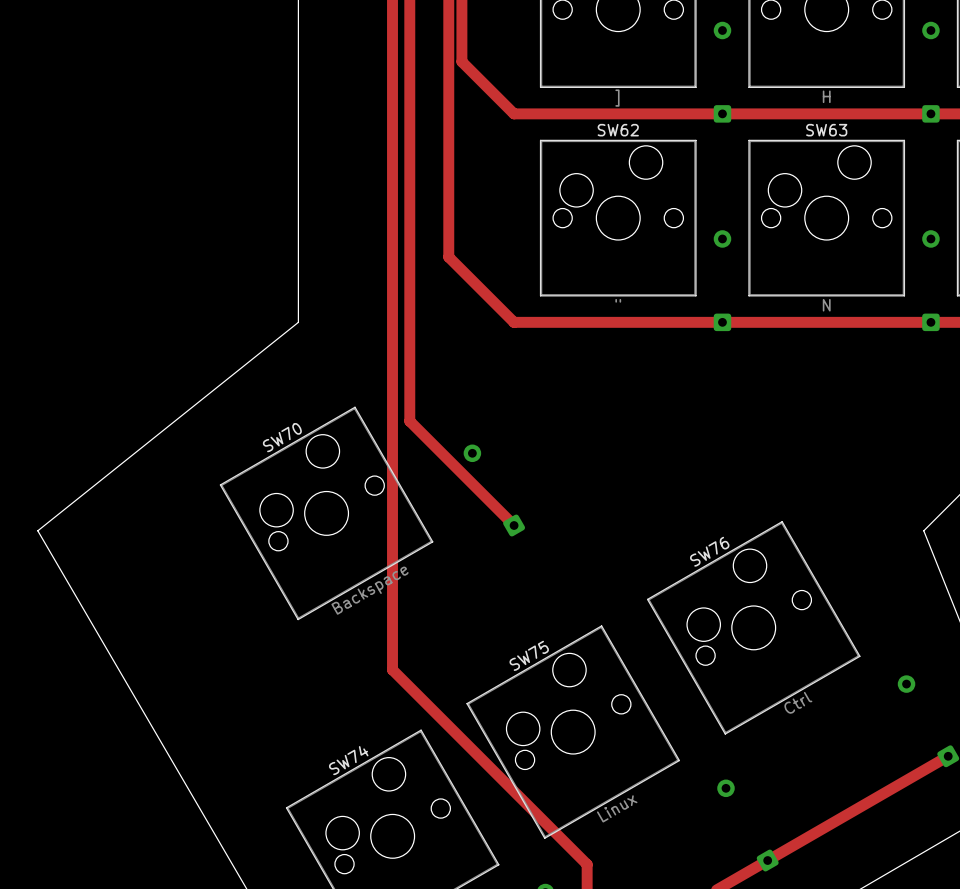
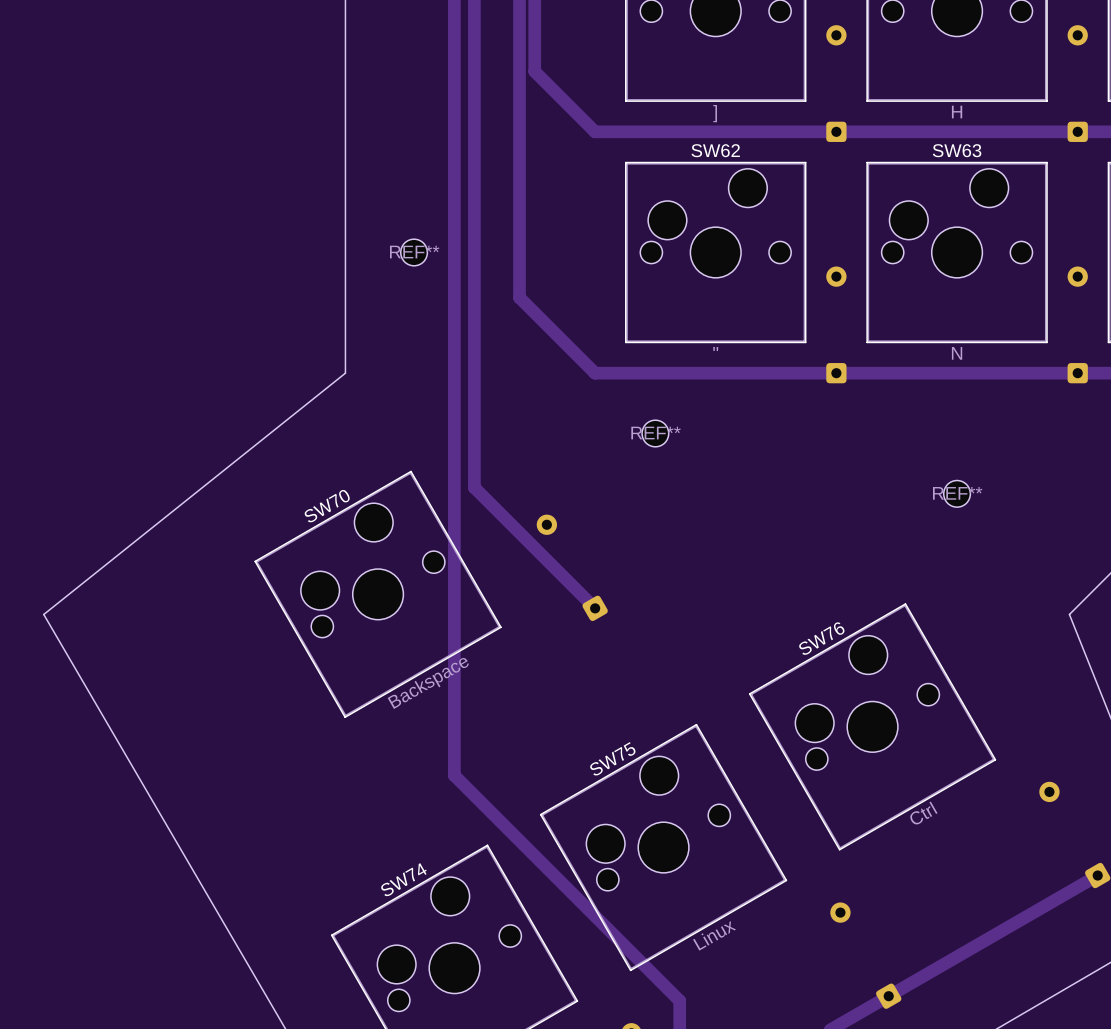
REF**: none -> (414, 252)
REF**: none -> (655, 433)
REF**: none -> (957, 493)

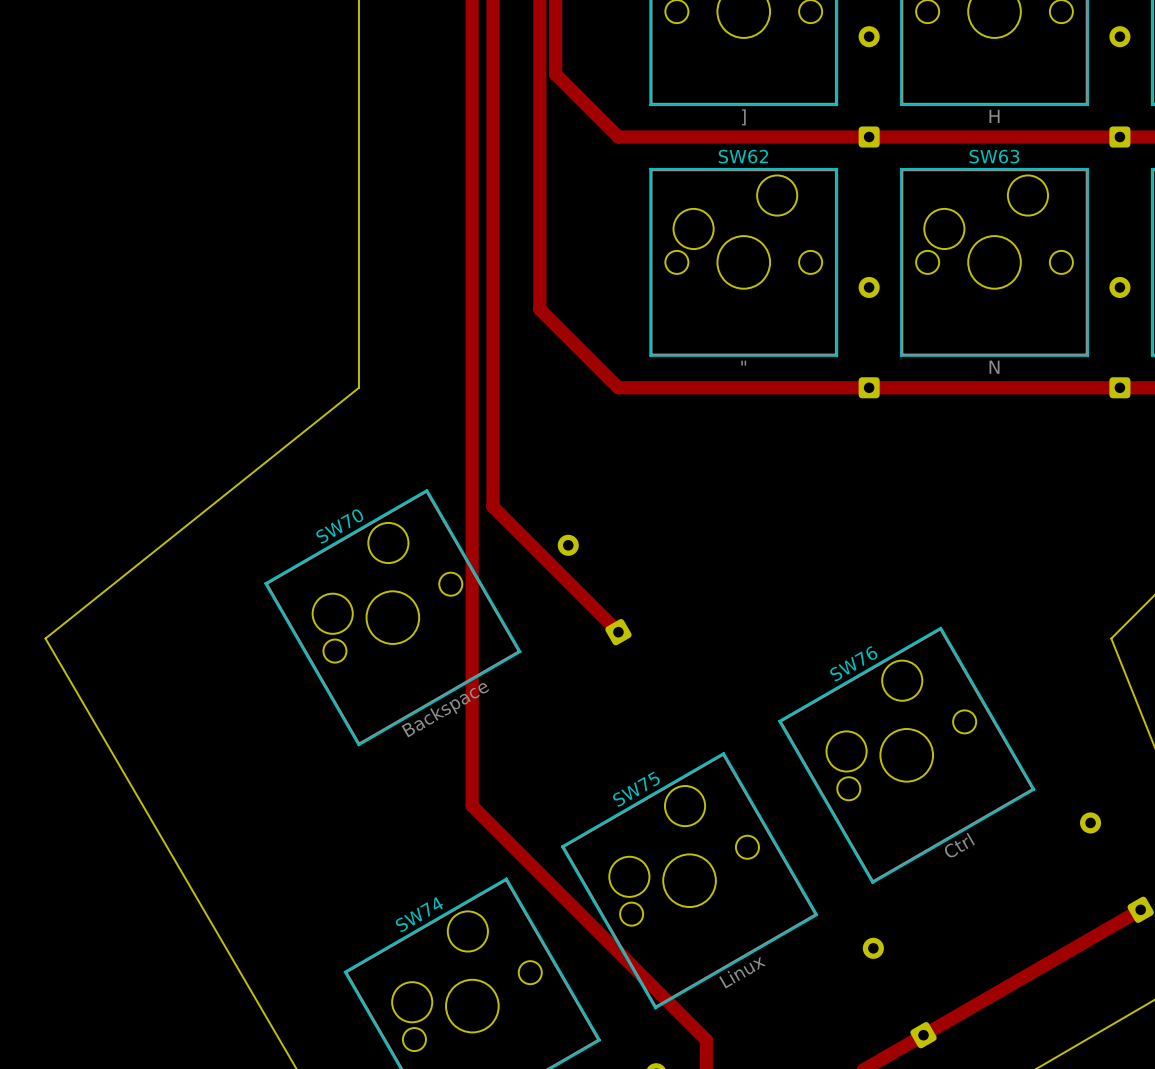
REF**: (414, 252) -> none
REF**: (655, 433) -> none
REF**: (957, 493) -> none

